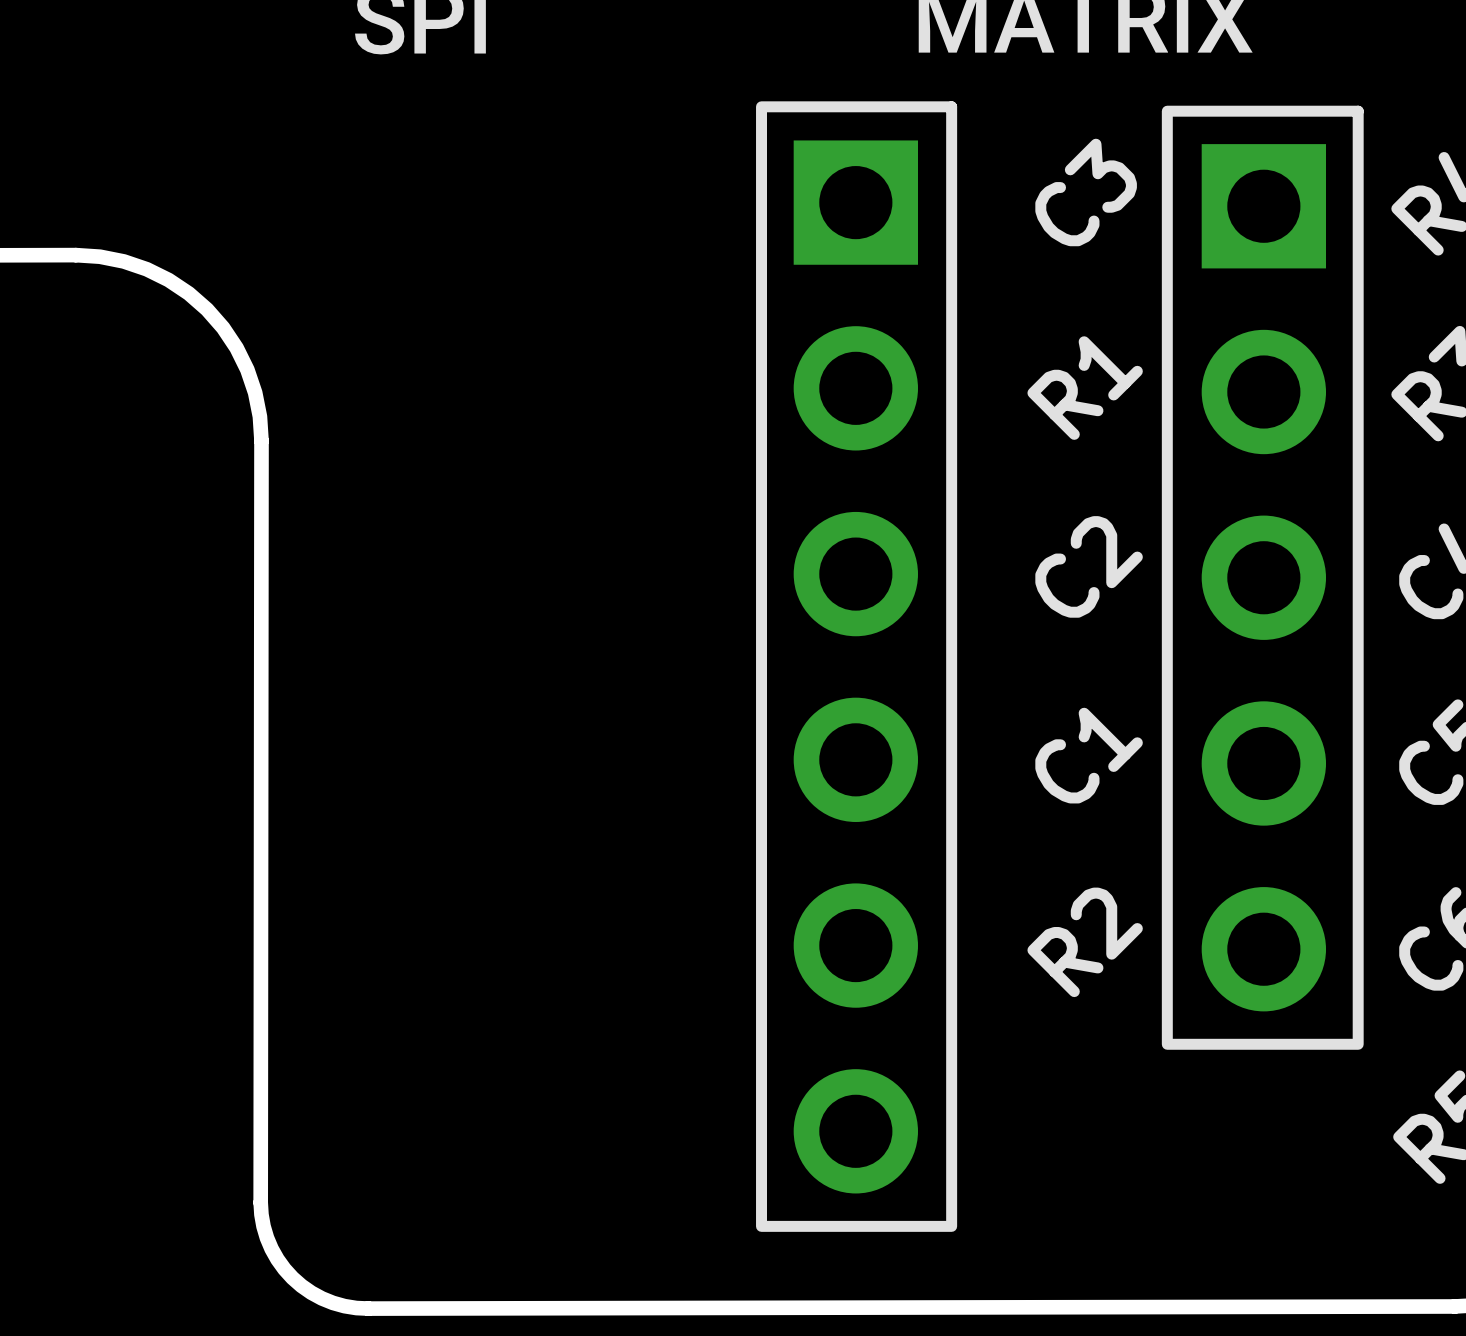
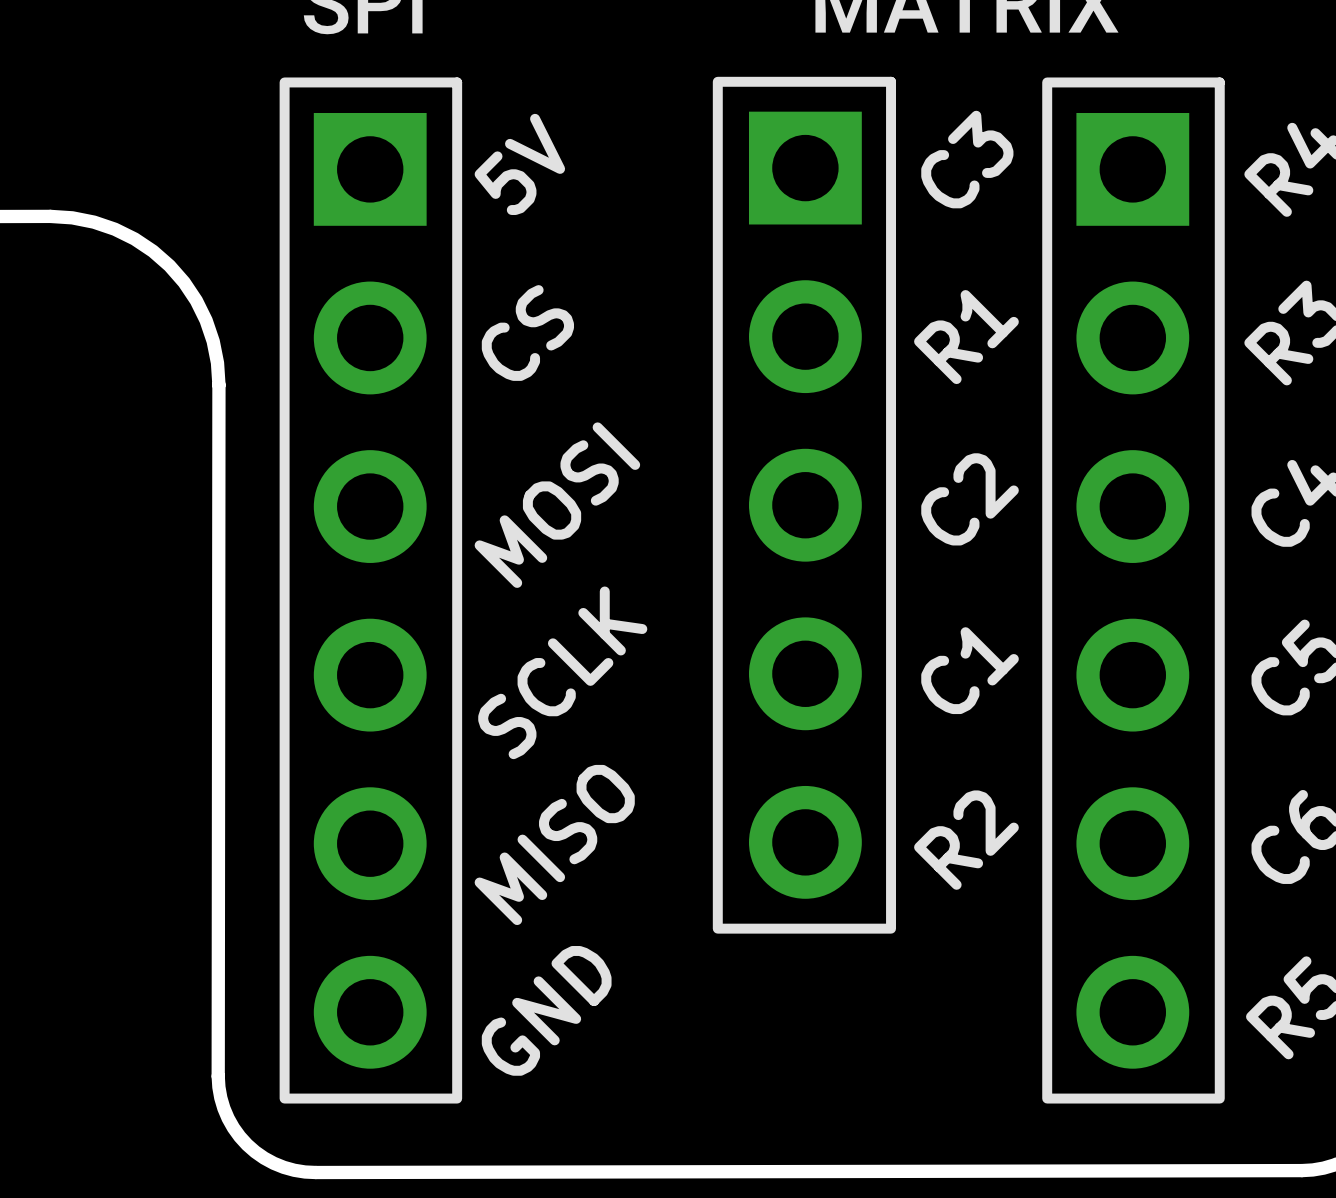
text: none -> 5V (519, 164)
text: none -> CS (527, 333)
text: none -> MOSI (557, 505)
part position: (1262, 577) -> (804, 505)
part: (856, 666) -> none
part: none -> (370, 590)
part: none -> (1133, 590)
text: none -> SCLK (562, 672)
text: none -> MISO (554, 844)
text: none -> GND (546, 1010)

